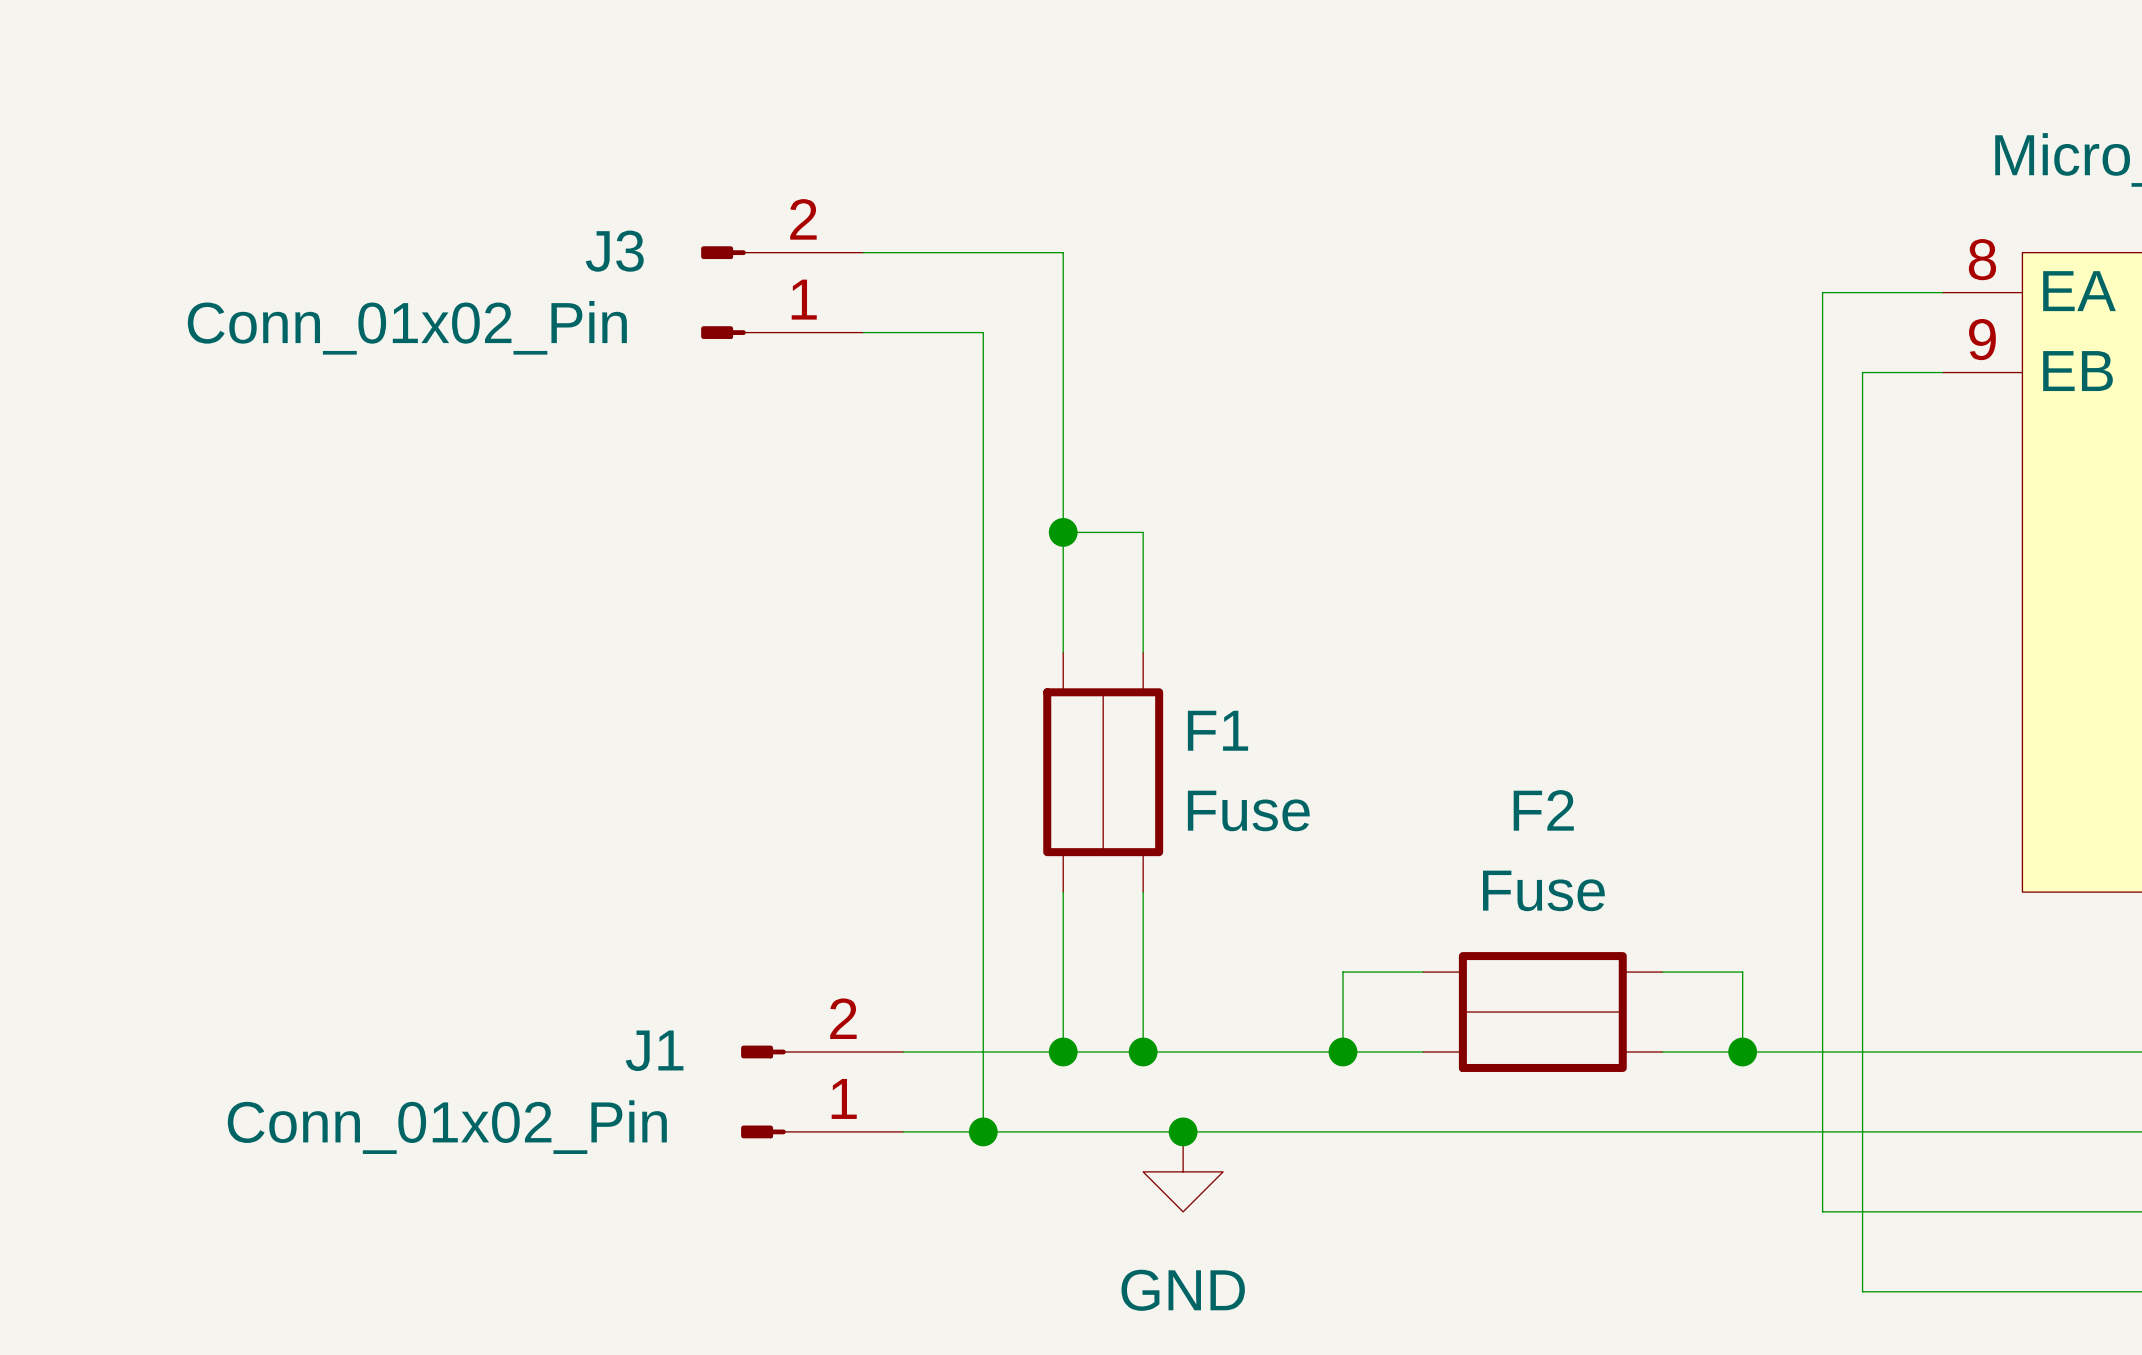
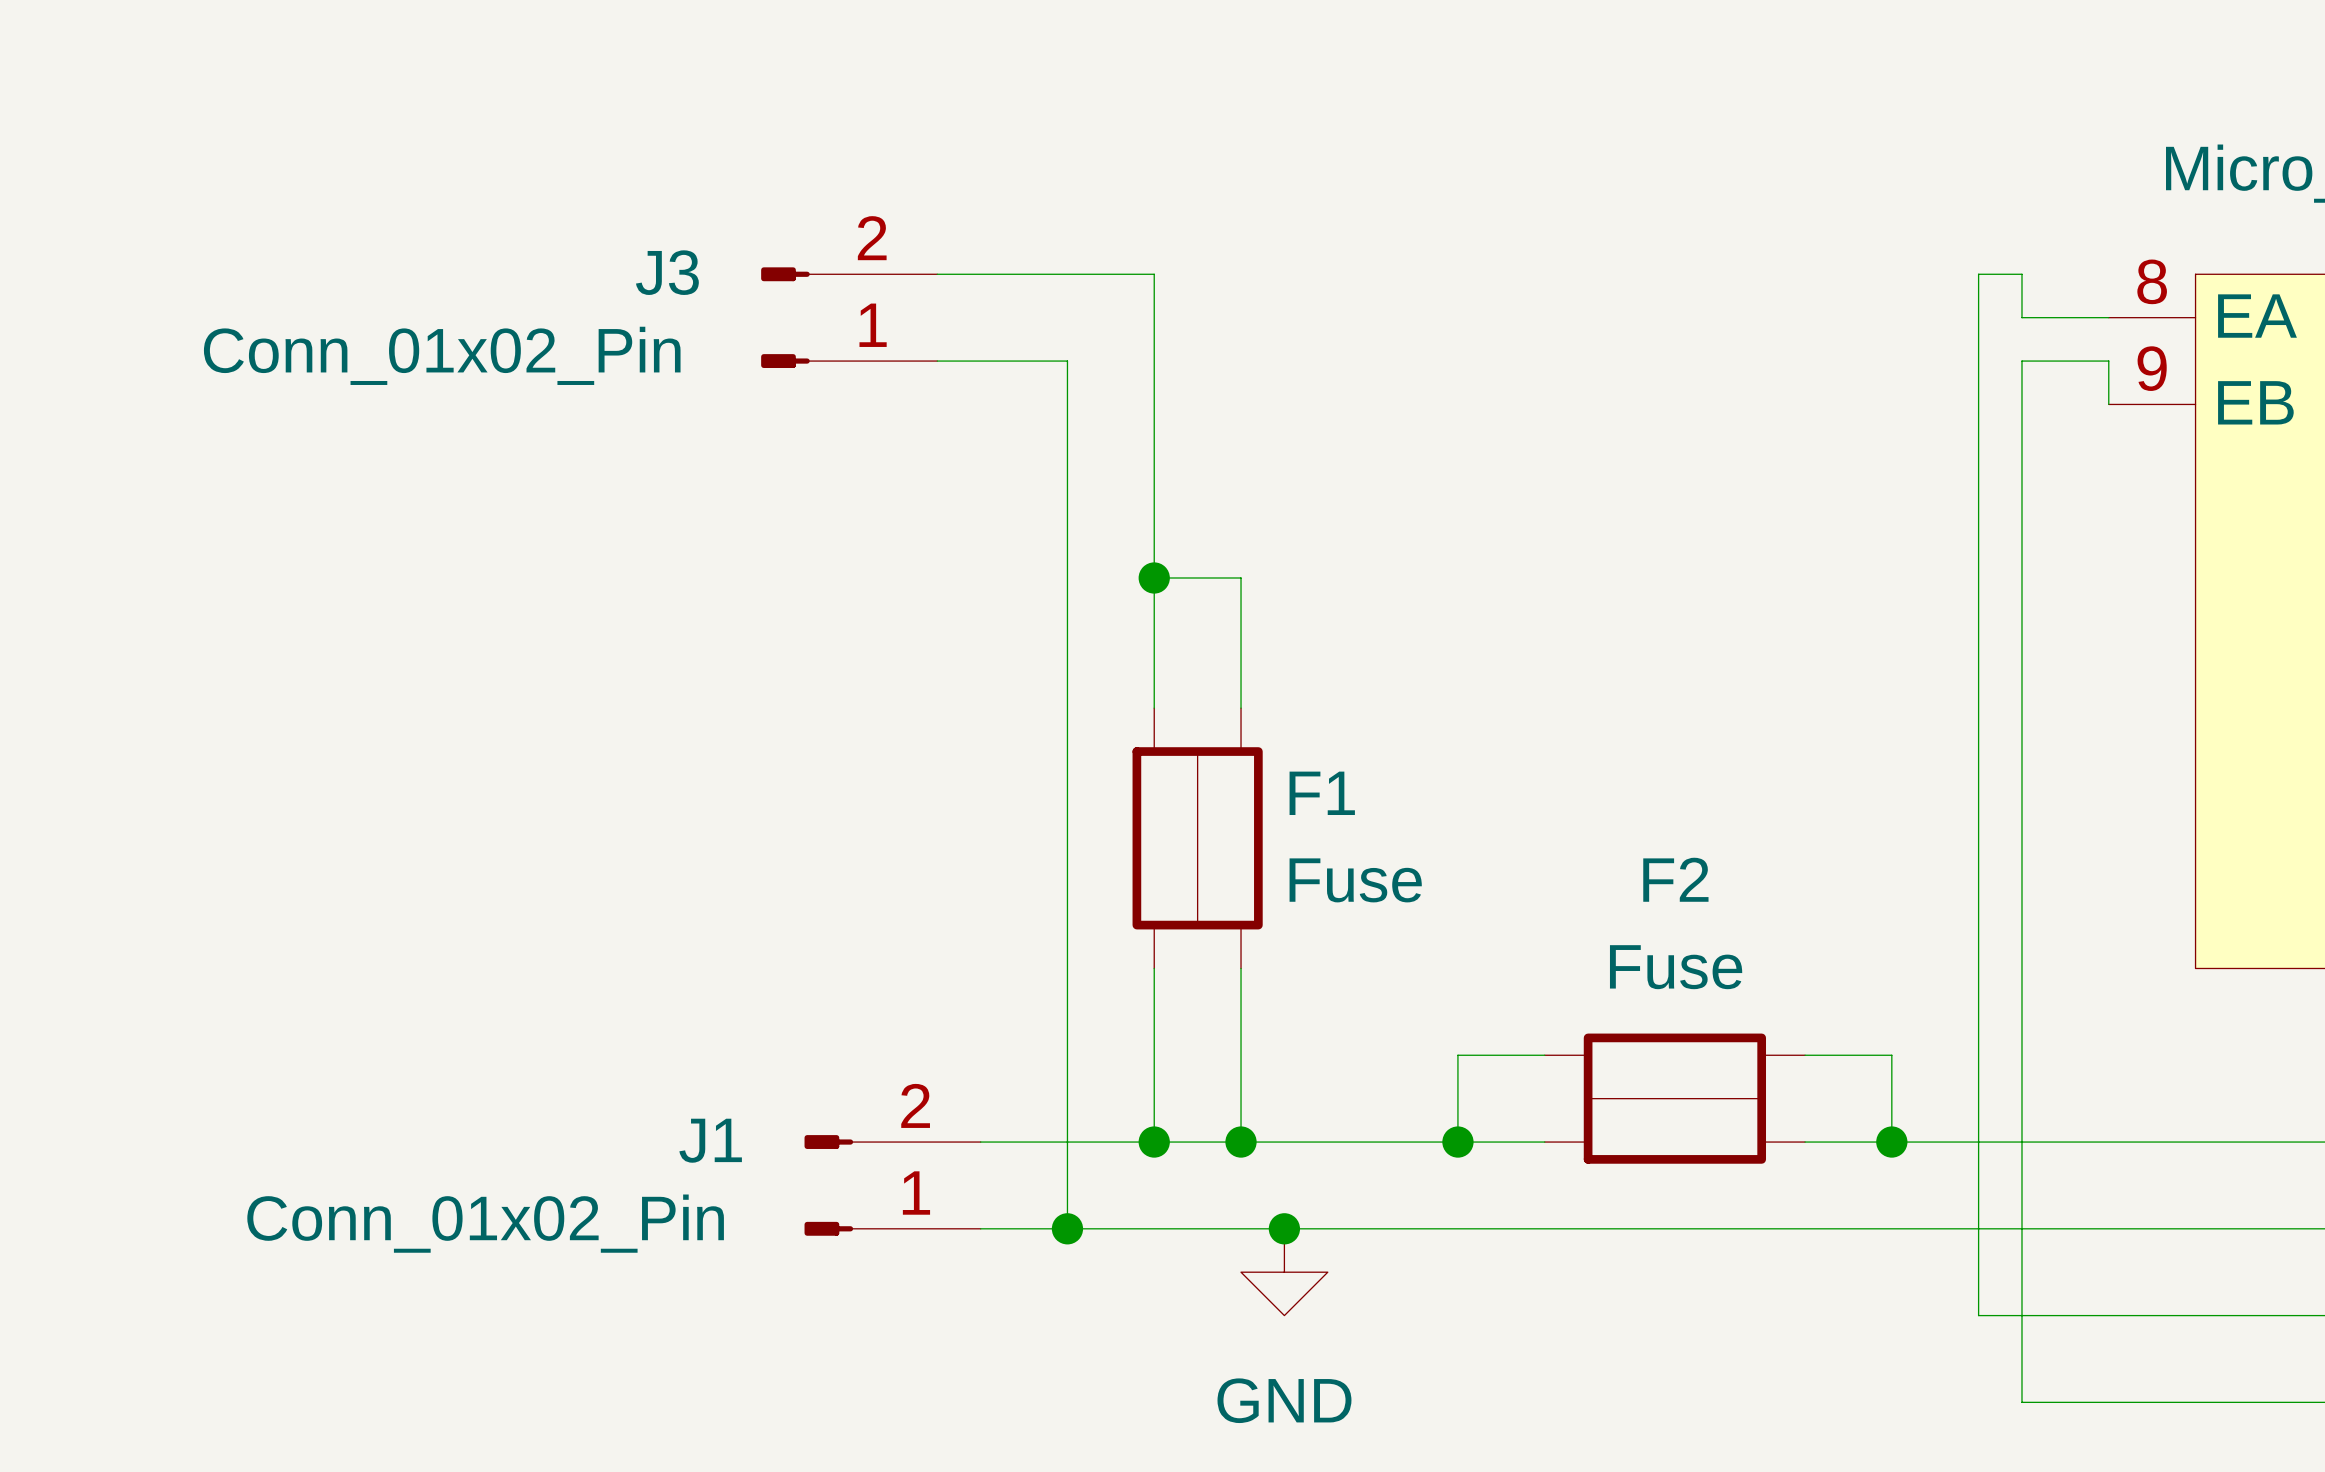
wire: (1822, 292) (1862, 292) -> (1978, 317) (1978, 274) (2021, 274) (2021, 317)
wire: (1862, 372) (1942, 372) -> (2021, 404) (2021, 361) (2108, 361) (2108, 404)

